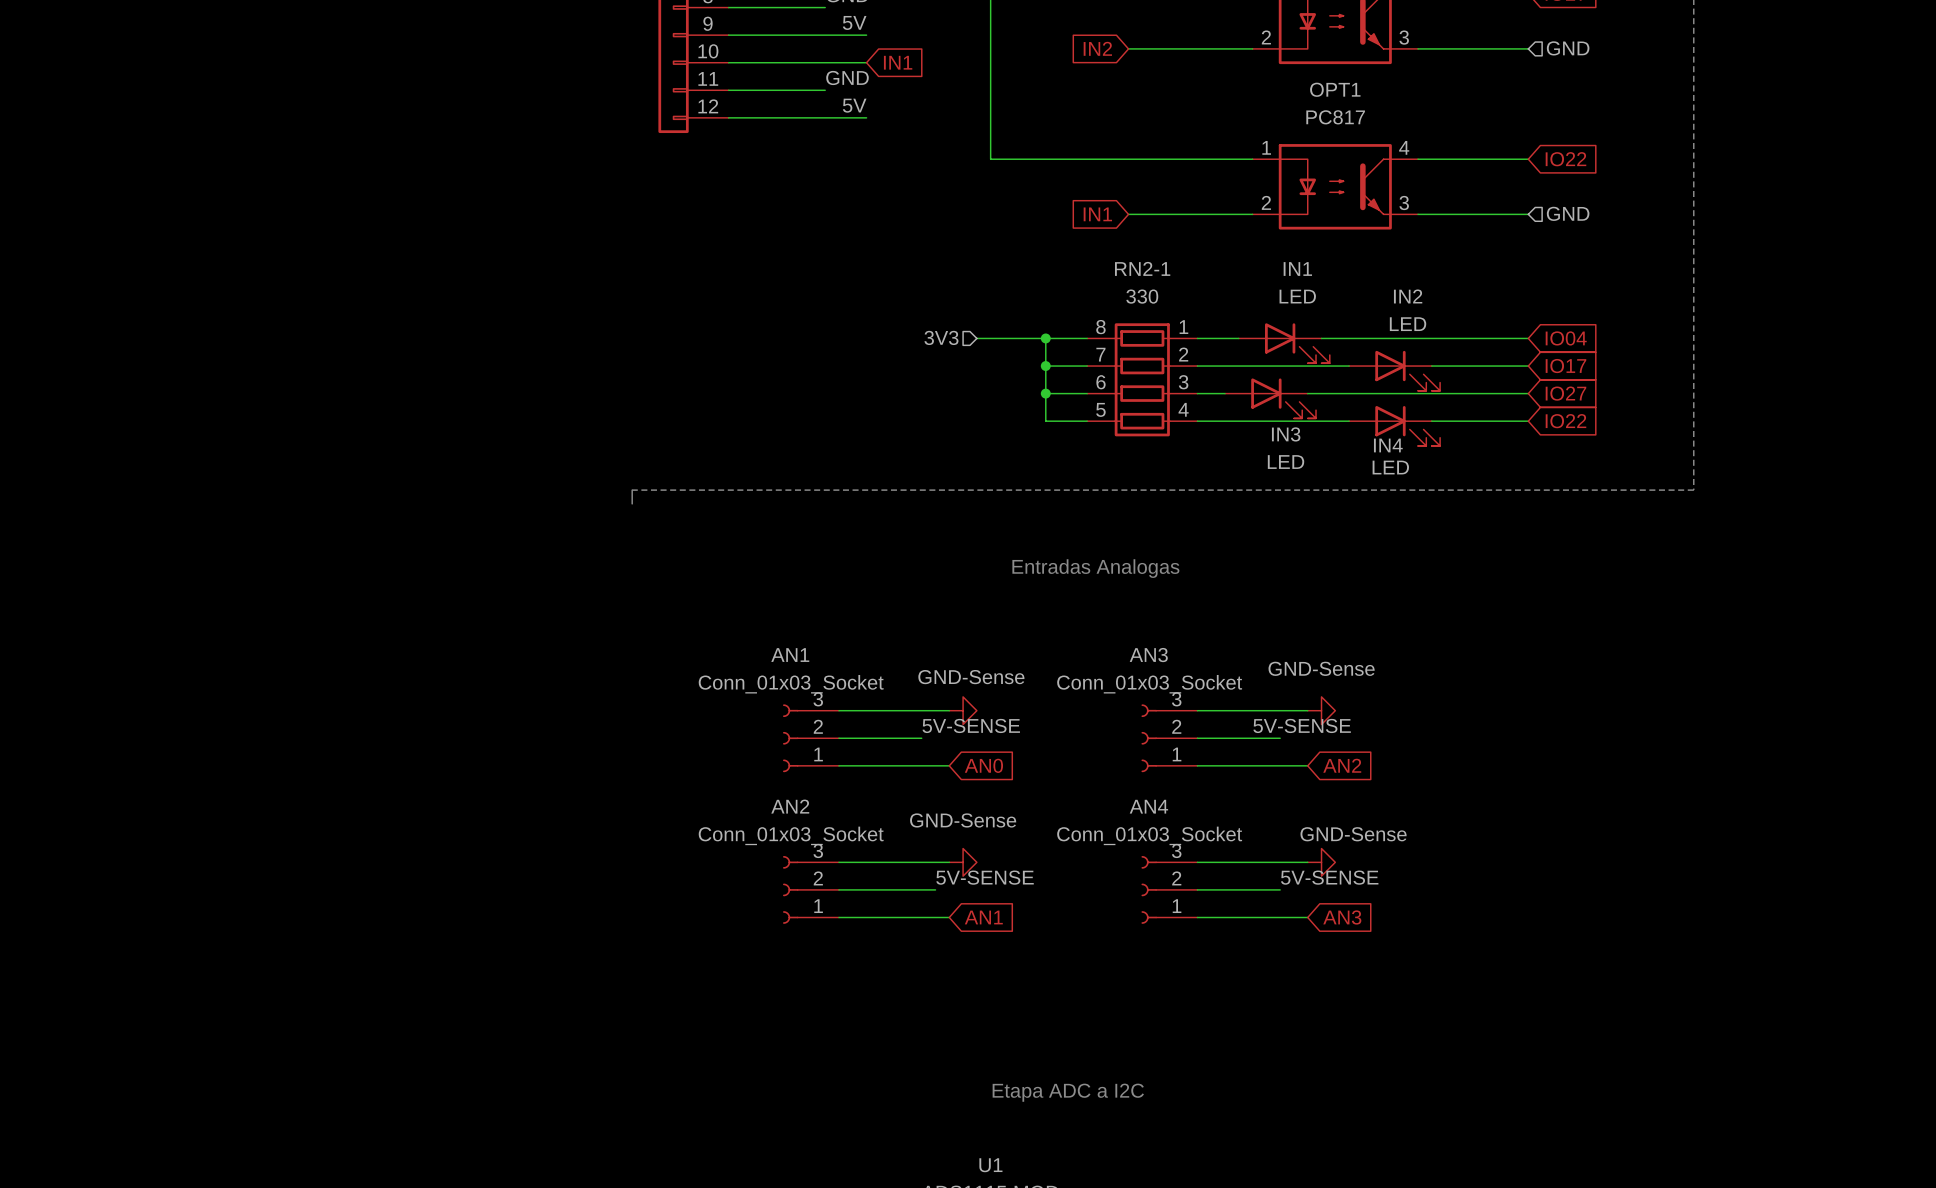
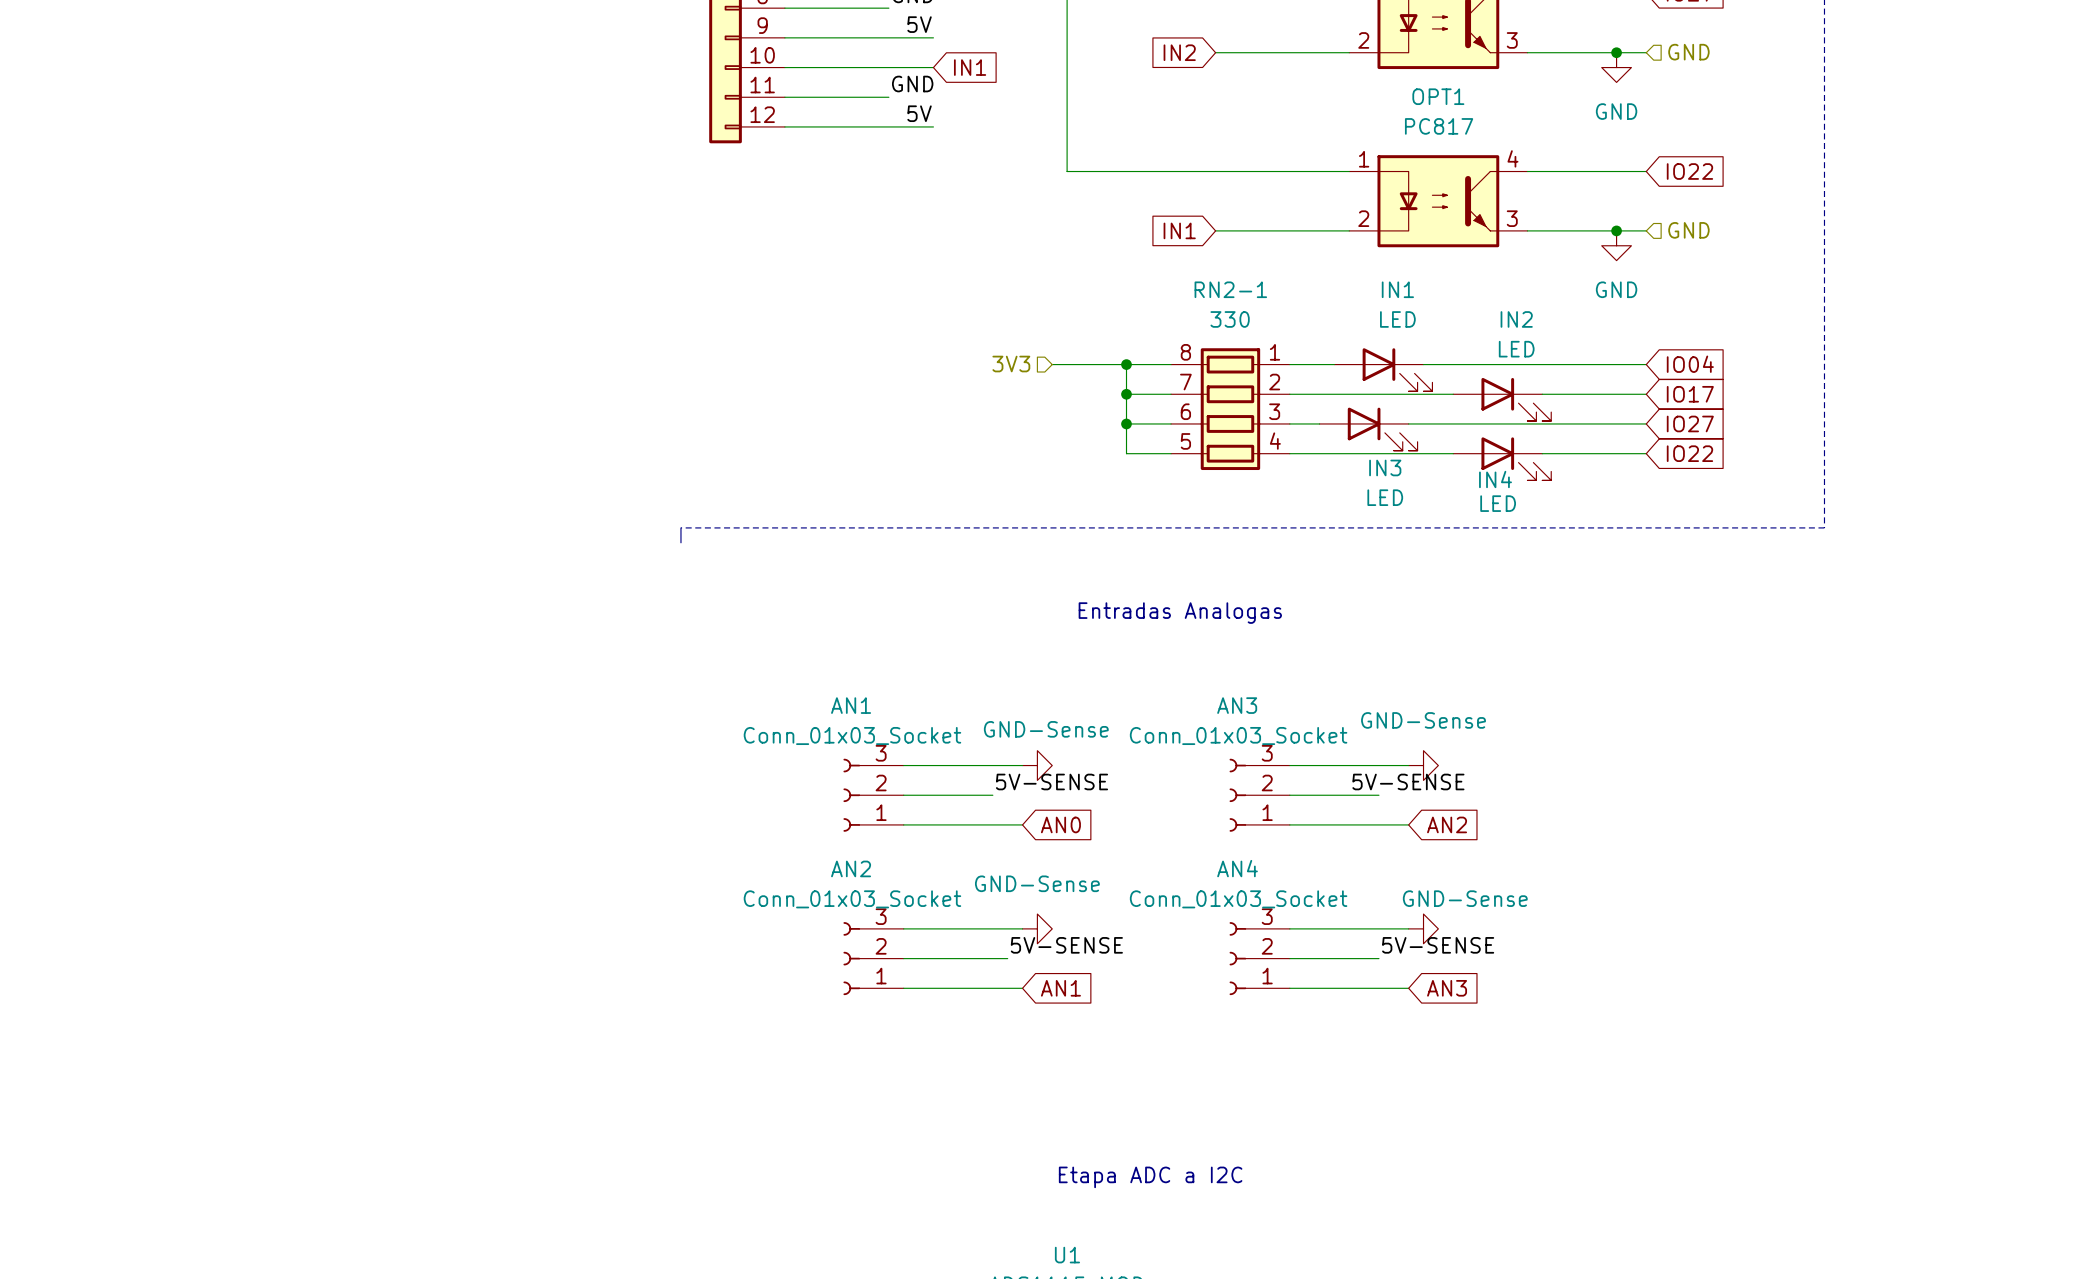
junction: none -> (1616, 52)
power symbol: none -> GND (1616, 67)
junction: none -> (1616, 230)
power symbol: none -> GND (1616, 245)

